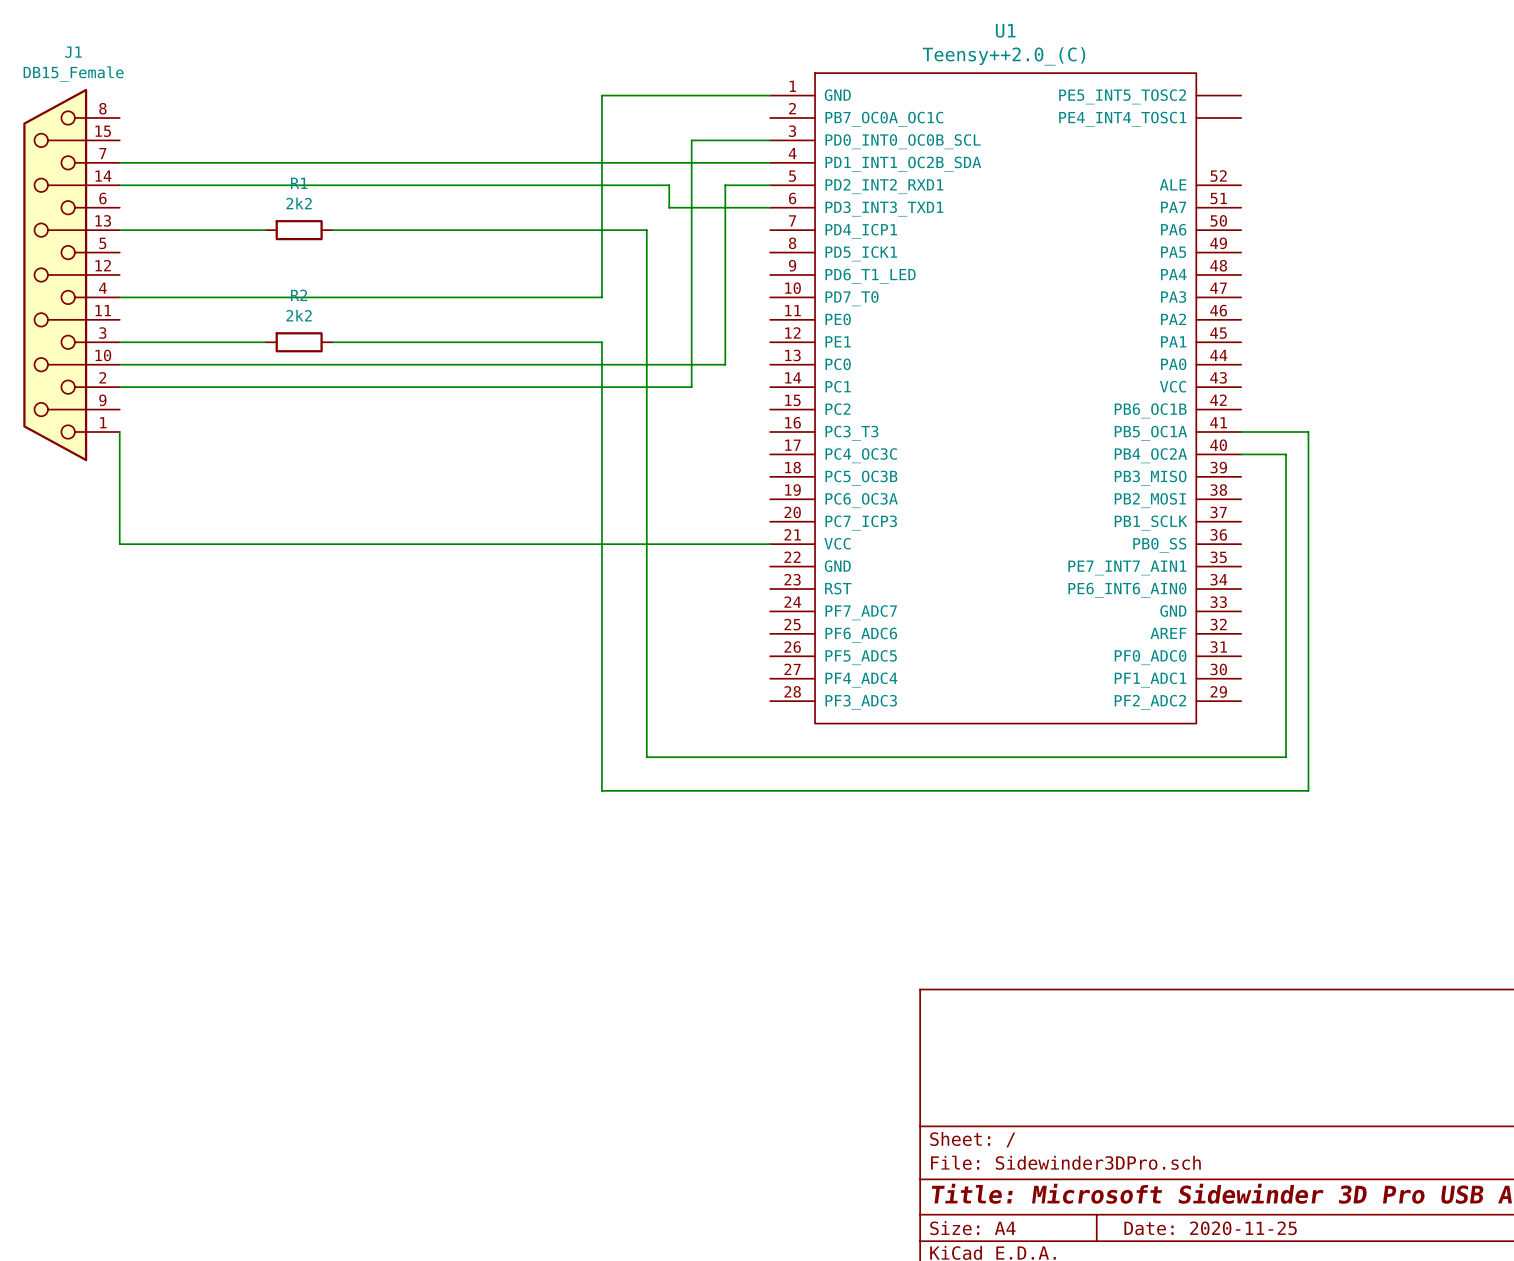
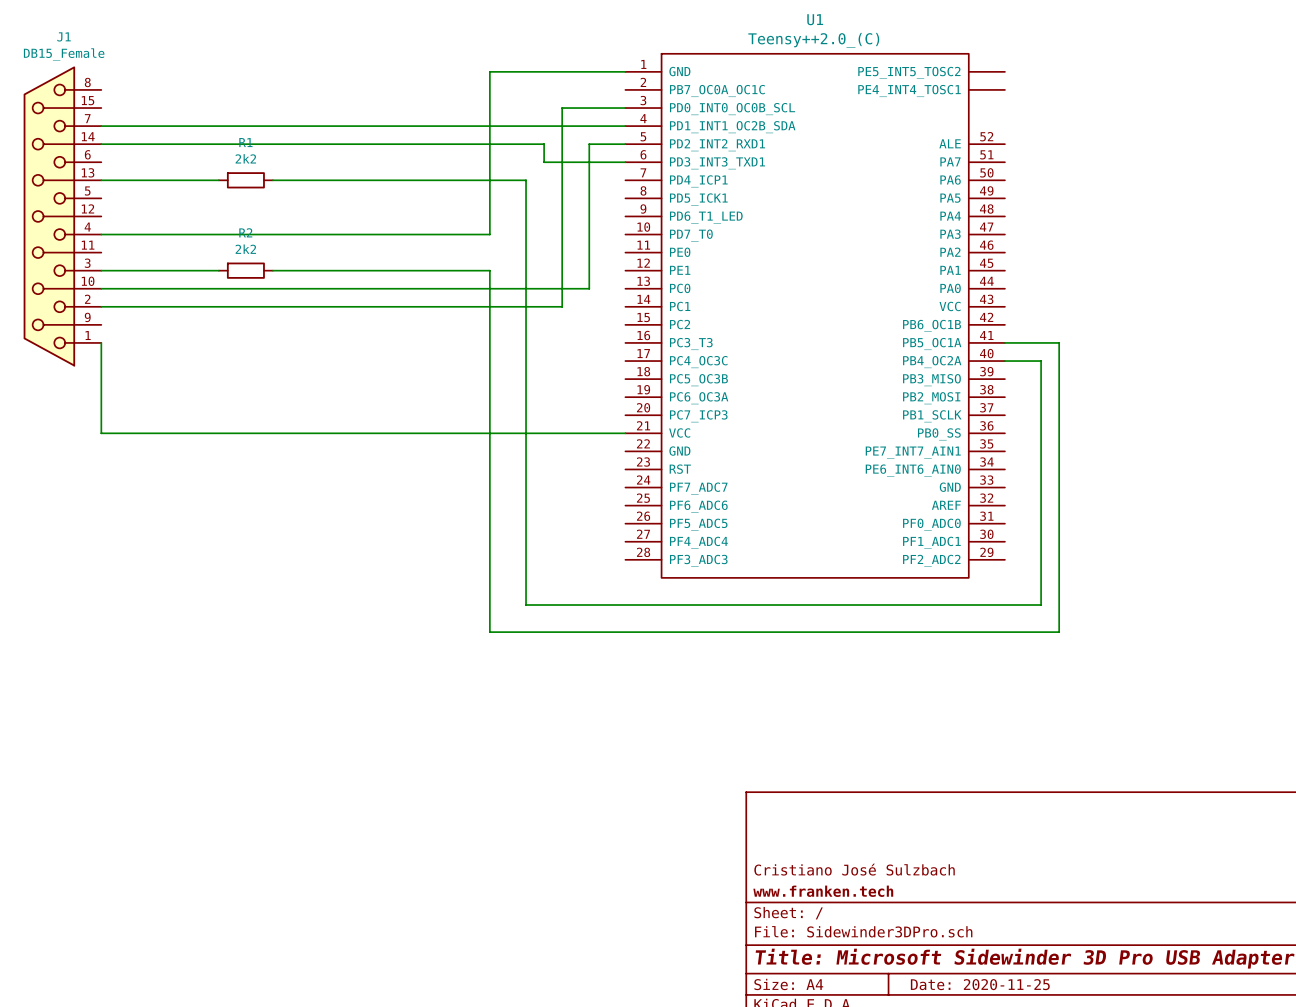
title block: none -> Cristiano José Sulzbach (854, 869)
title block: none -> www.franken.tech (823, 891)

